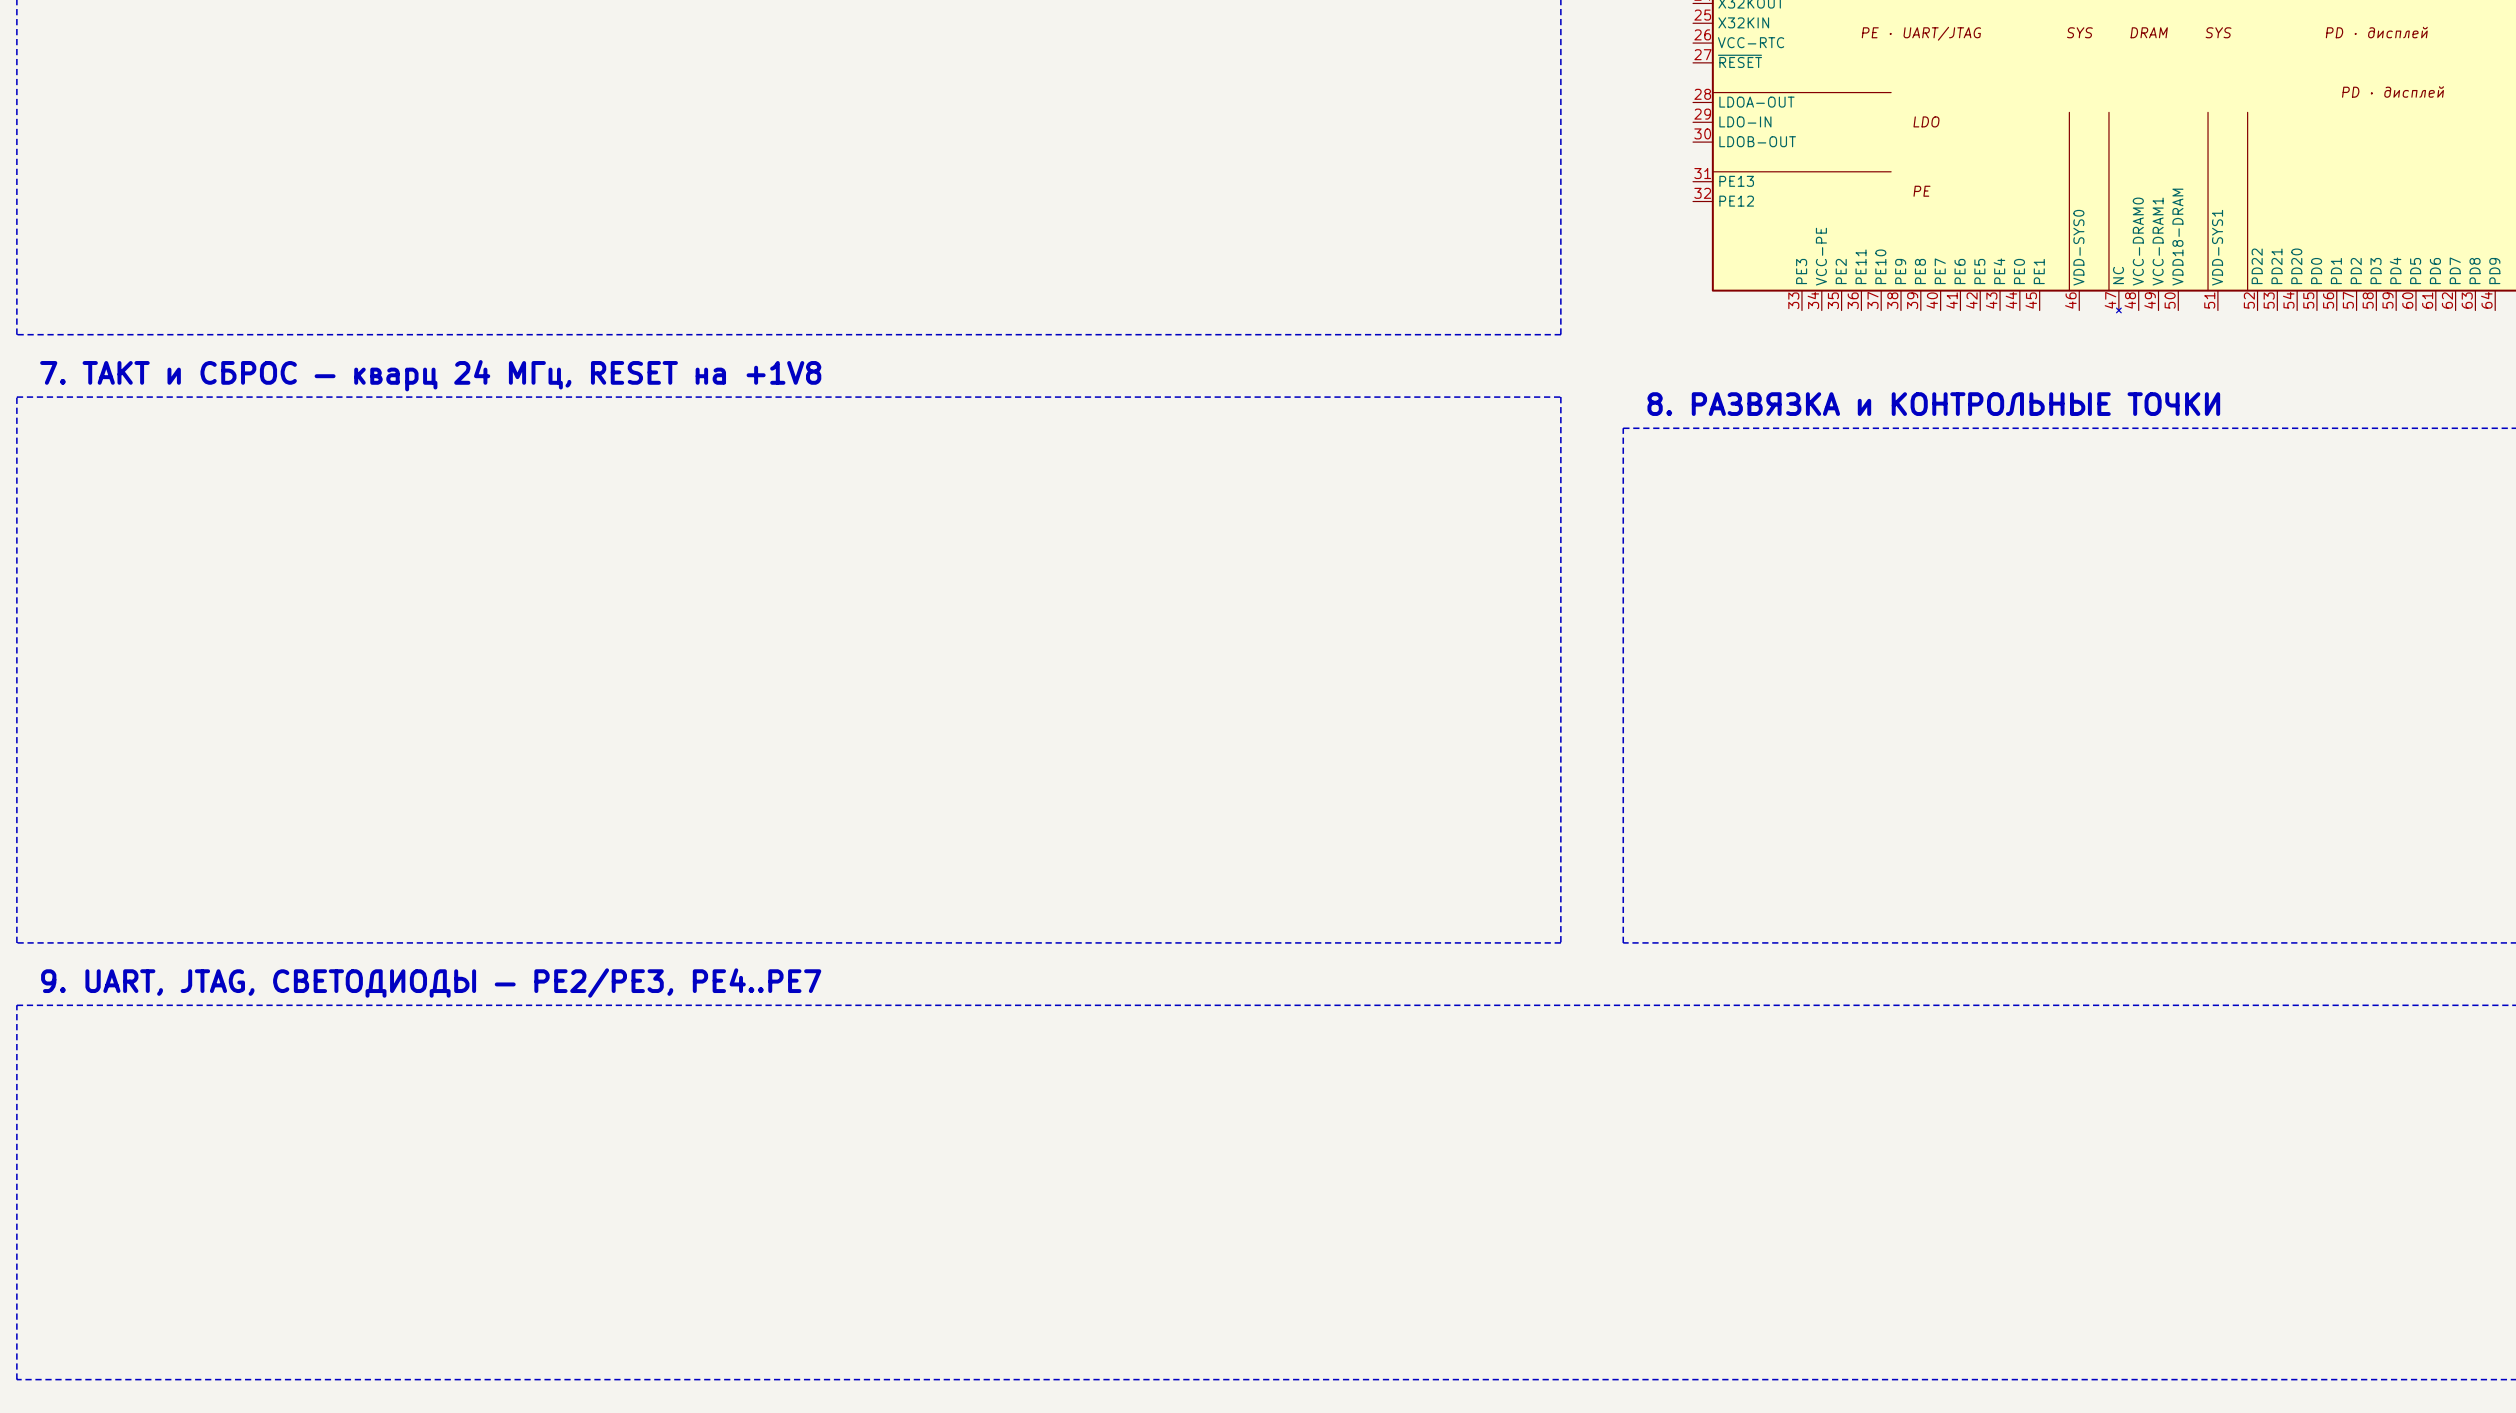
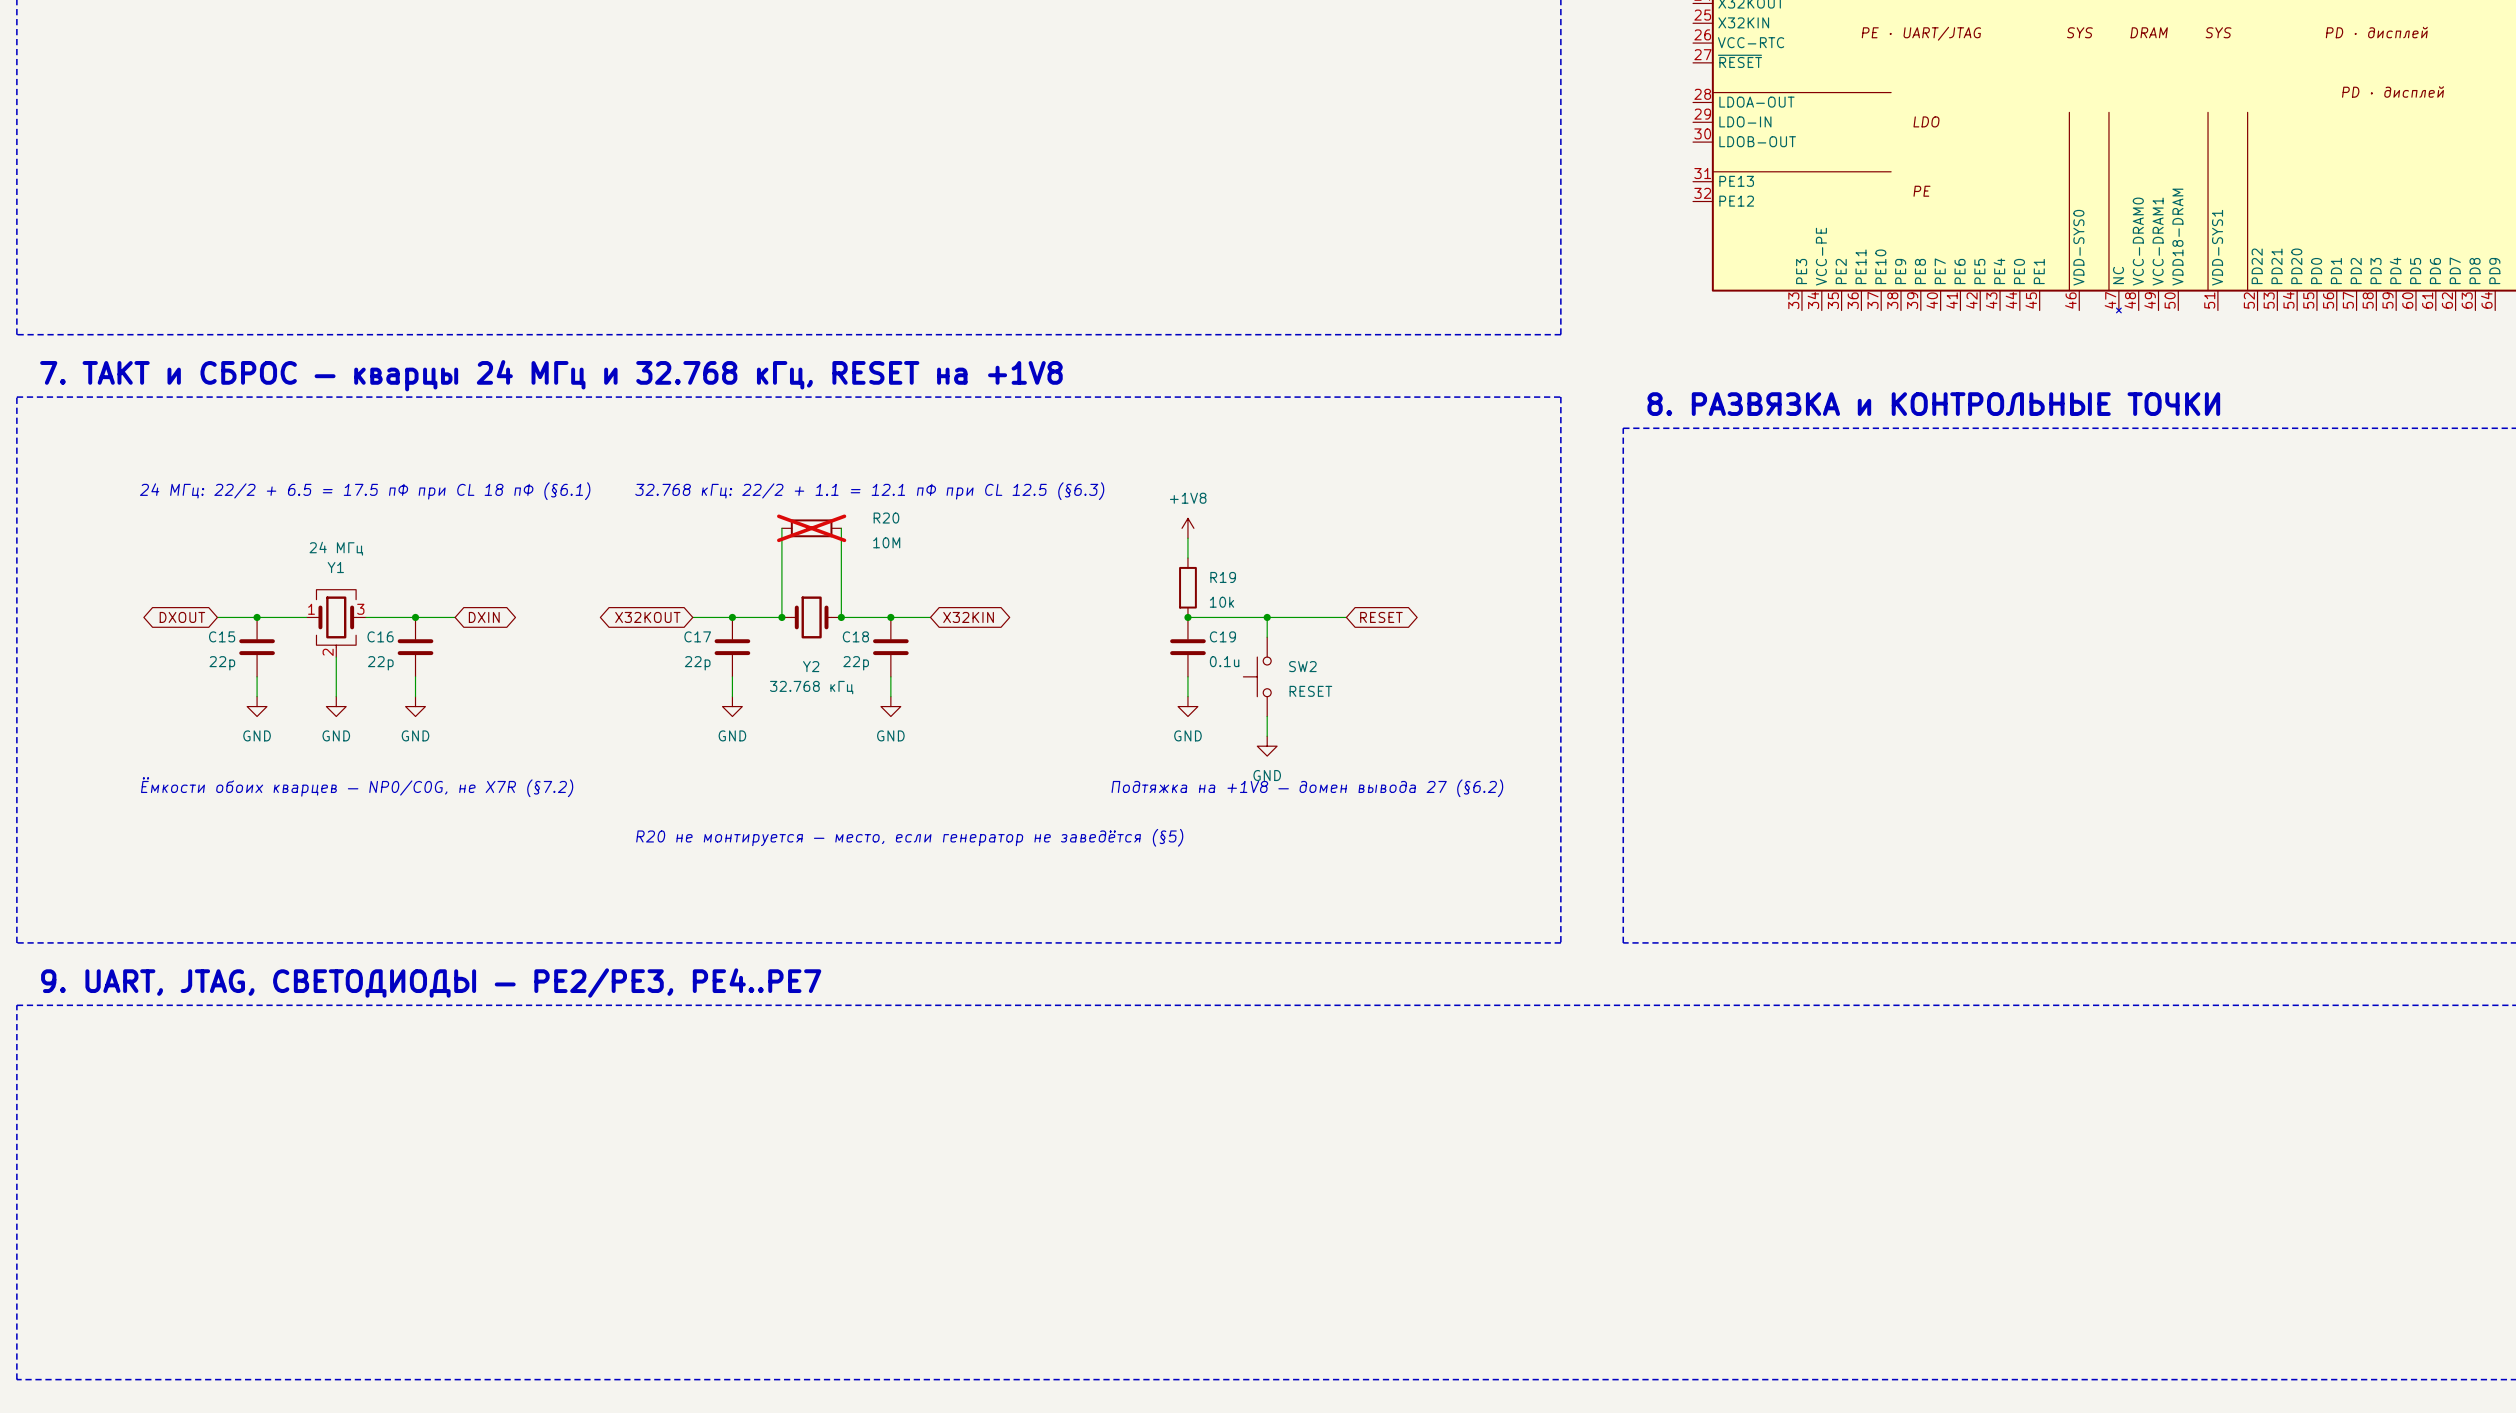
text: 7. ТАКТ и СБРОС — кварц 24 МГц, RESET на +1V8 (430, 375) -> 7. ТАКТ и СБРОС — кварцы 24 МГц и 32.768 кГц, RESET на +1V8 (551, 375)
text: none -> 24 МГц: 22/2 + 6.5 = 17.5 пФ при CL 18 пФ (§6.1) (365, 491)
text: none -> 32.768 кГц: 22/2 + 1.1 = 12.1 пФ при CL 12.5 (§6.3) (869, 491)
wire: none -> (781, 528) (781, 617) (692, 617)
R20: none -> 10M (811, 528)
wire: none -> (841, 528) (841, 617) (930, 617)
power symbol: none -> +1V8 (1187, 528)
wire: none -> (1187, 538) (1187, 558)
R19: none -> 10k (1187, 587)
global label: none -> DXOUT (182, 617)
wire: none -> (217, 617) (306, 617)
junction: none -> (257, 617)
wire: none -> (365, 617) (455, 617)
junction: none -> (415, 617)
global label: none -> DXIN (484, 617)
global label: none -> X32KOUT (647, 617)
junction: none -> (732, 617)
junction: none -> (781, 617)
Y2: none -> 32.768 кГц (811, 617)
junction: none -> (841, 617)
junction: none -> (890, 617)
global label: none -> X32KIN (968, 617)
wire: none -> (1187, 617) (1346, 617)
junction: none -> (1187, 617)
wire: none -> (1267, 617) (1267, 637)
junction: none -> (1267, 617)
global label: none -> RESET (1381, 617)
Y1: none -> 24 МГц (336, 623)
C15: none -> 22p (257, 647)
C16: none -> 22p (415, 647)
C17: none -> 22p (732, 647)
C18: none -> 22p (890, 647)
C19: none -> 0.1u (1187, 647)
wire: none -> (336, 657) (336, 696)
wire: none -> (257, 676) (257, 696)
wire: none -> (415, 676) (415, 696)
wire: none -> (732, 676) (732, 696)
wire: none -> (890, 676) (890, 696)
wire: none -> (1187, 676) (1187, 696)
SW2: none -> RESET (1257, 676)
power symbol: none -> GND (257, 706)
power symbol: none -> GND (336, 706)
power symbol: none -> GND (415, 706)
power symbol: none -> GND (732, 706)
power symbol: none -> GND (890, 706)
power symbol: none -> GND (1187, 706)
wire: none -> (1267, 716) (1267, 736)
power symbol: none -> GND (1267, 746)
text: none -> Ёмкости обоих кварцев — NP0/C0G, не X7R (§7.2) (357, 787)
text: none -> Подтяжка на +1V8 — домен вывода 27 (§6.2) (1307, 788)
text: none -> R20 не монтируется — место, если генератор не заведётся (§5) (909, 837)

